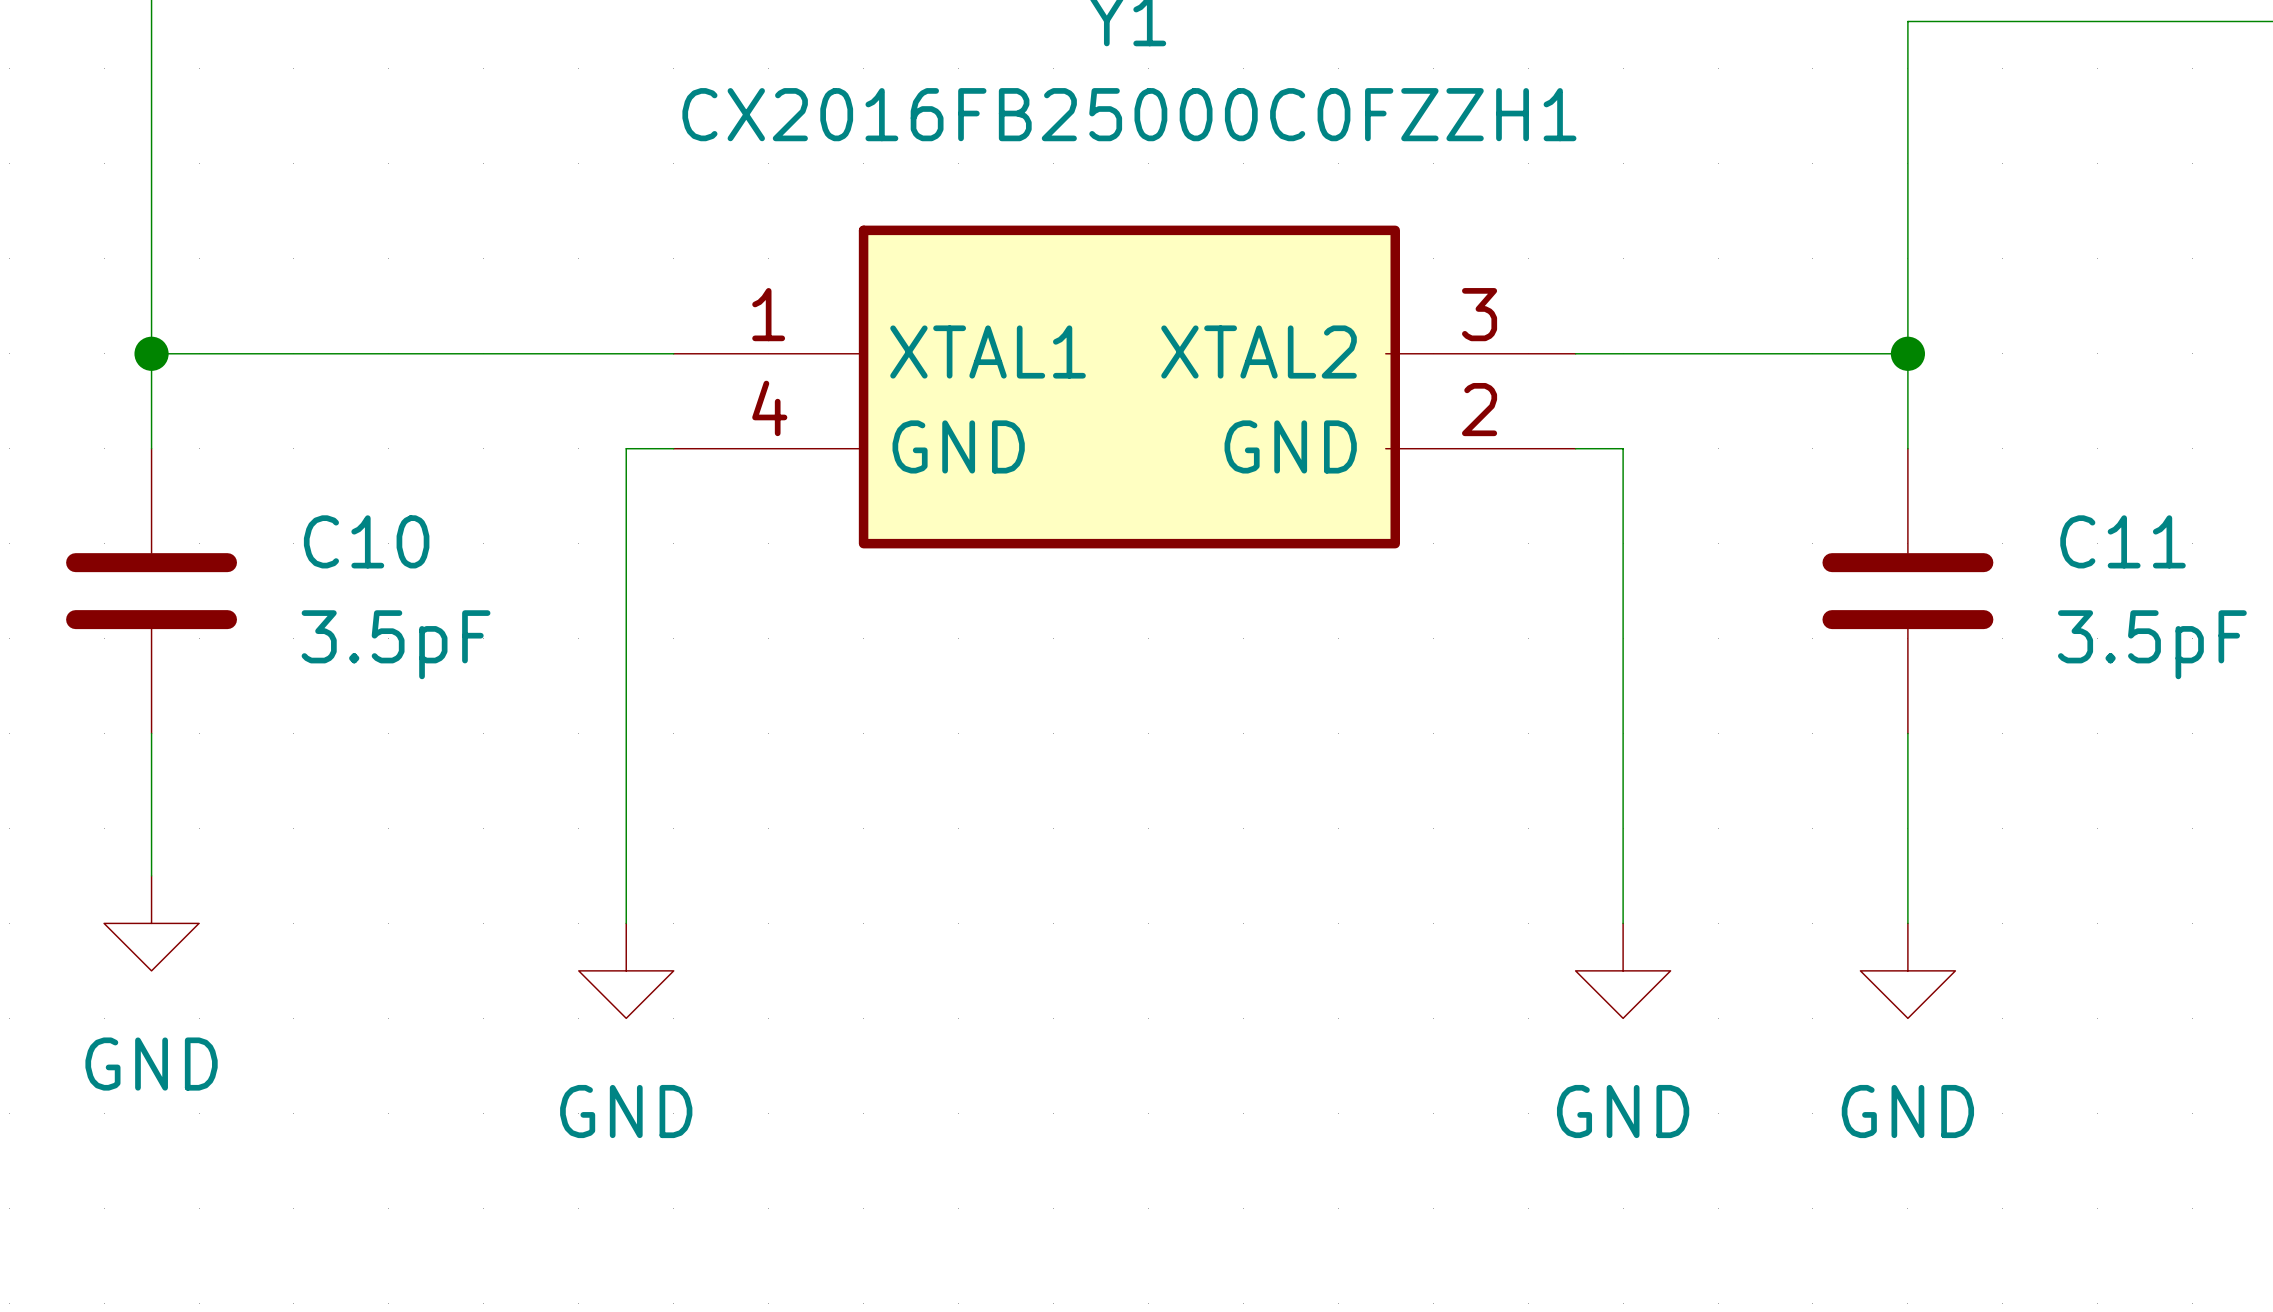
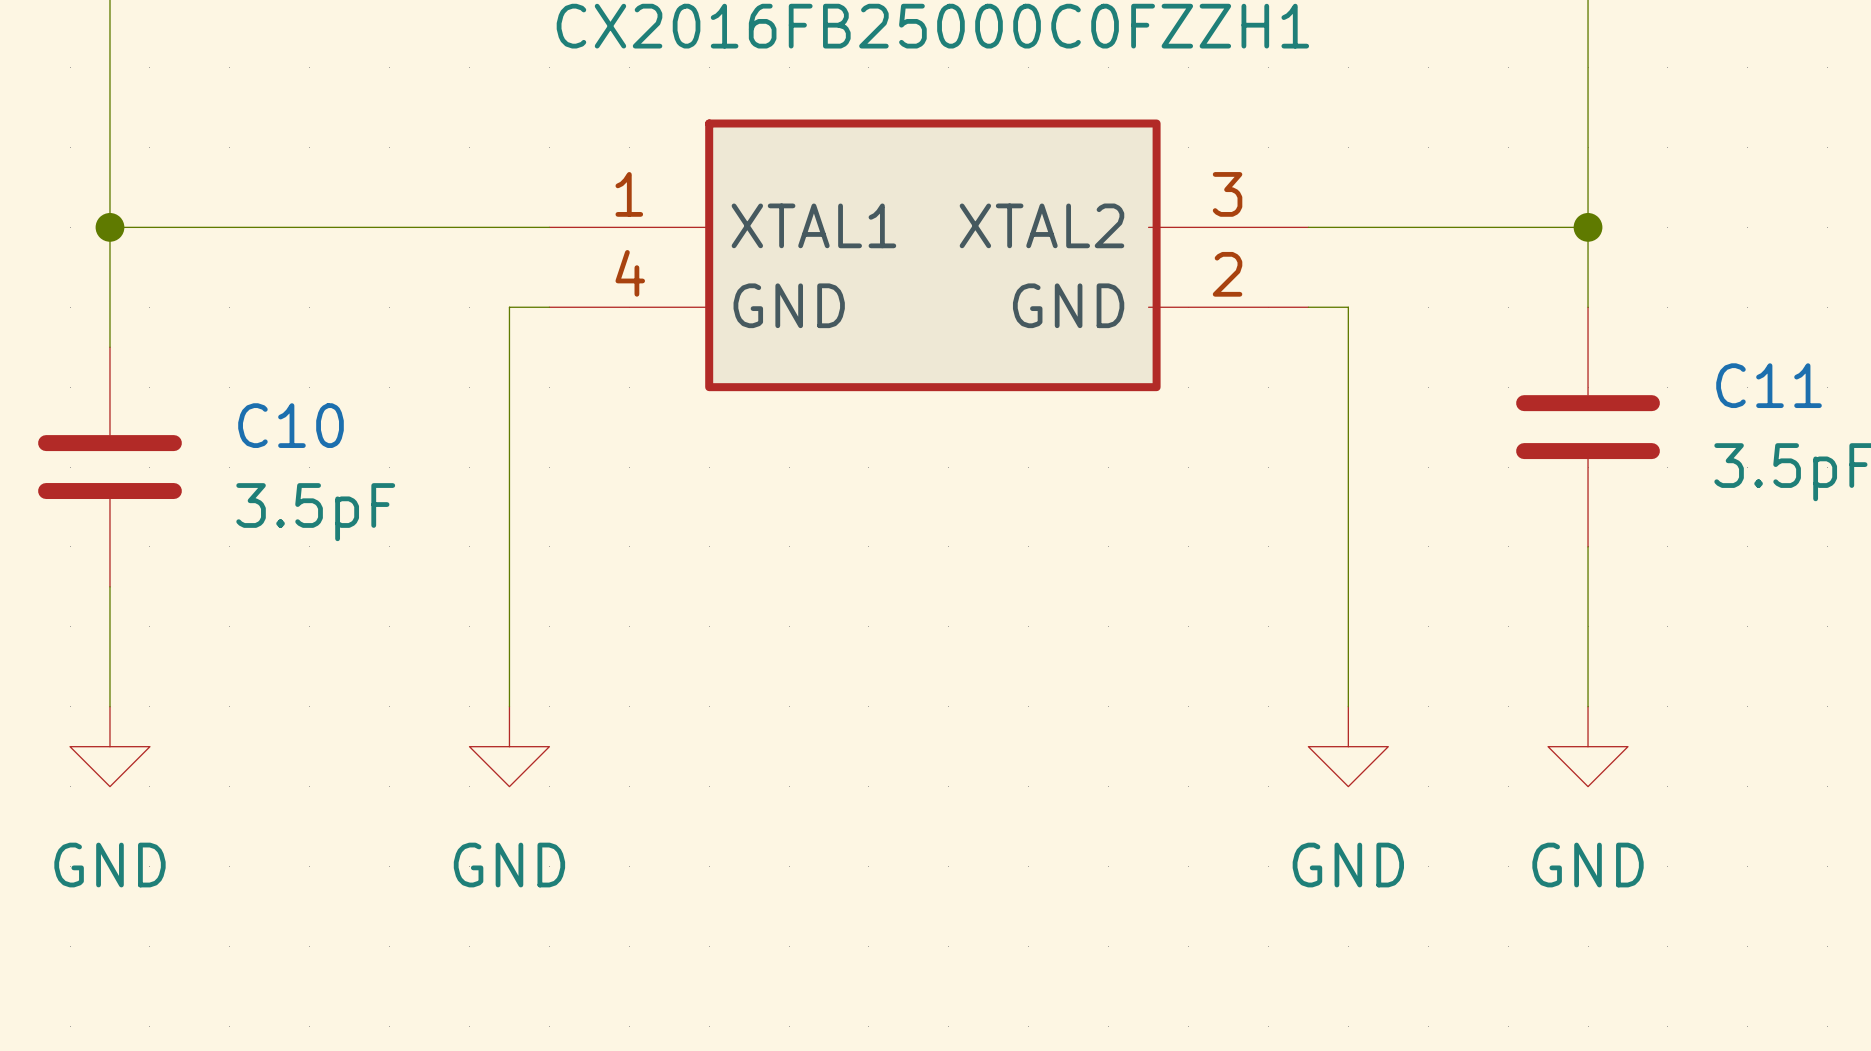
C10 position: (151, 591) -> (109, 467)
power symbol position: GND (151, 923) -> GND (109, 746)

